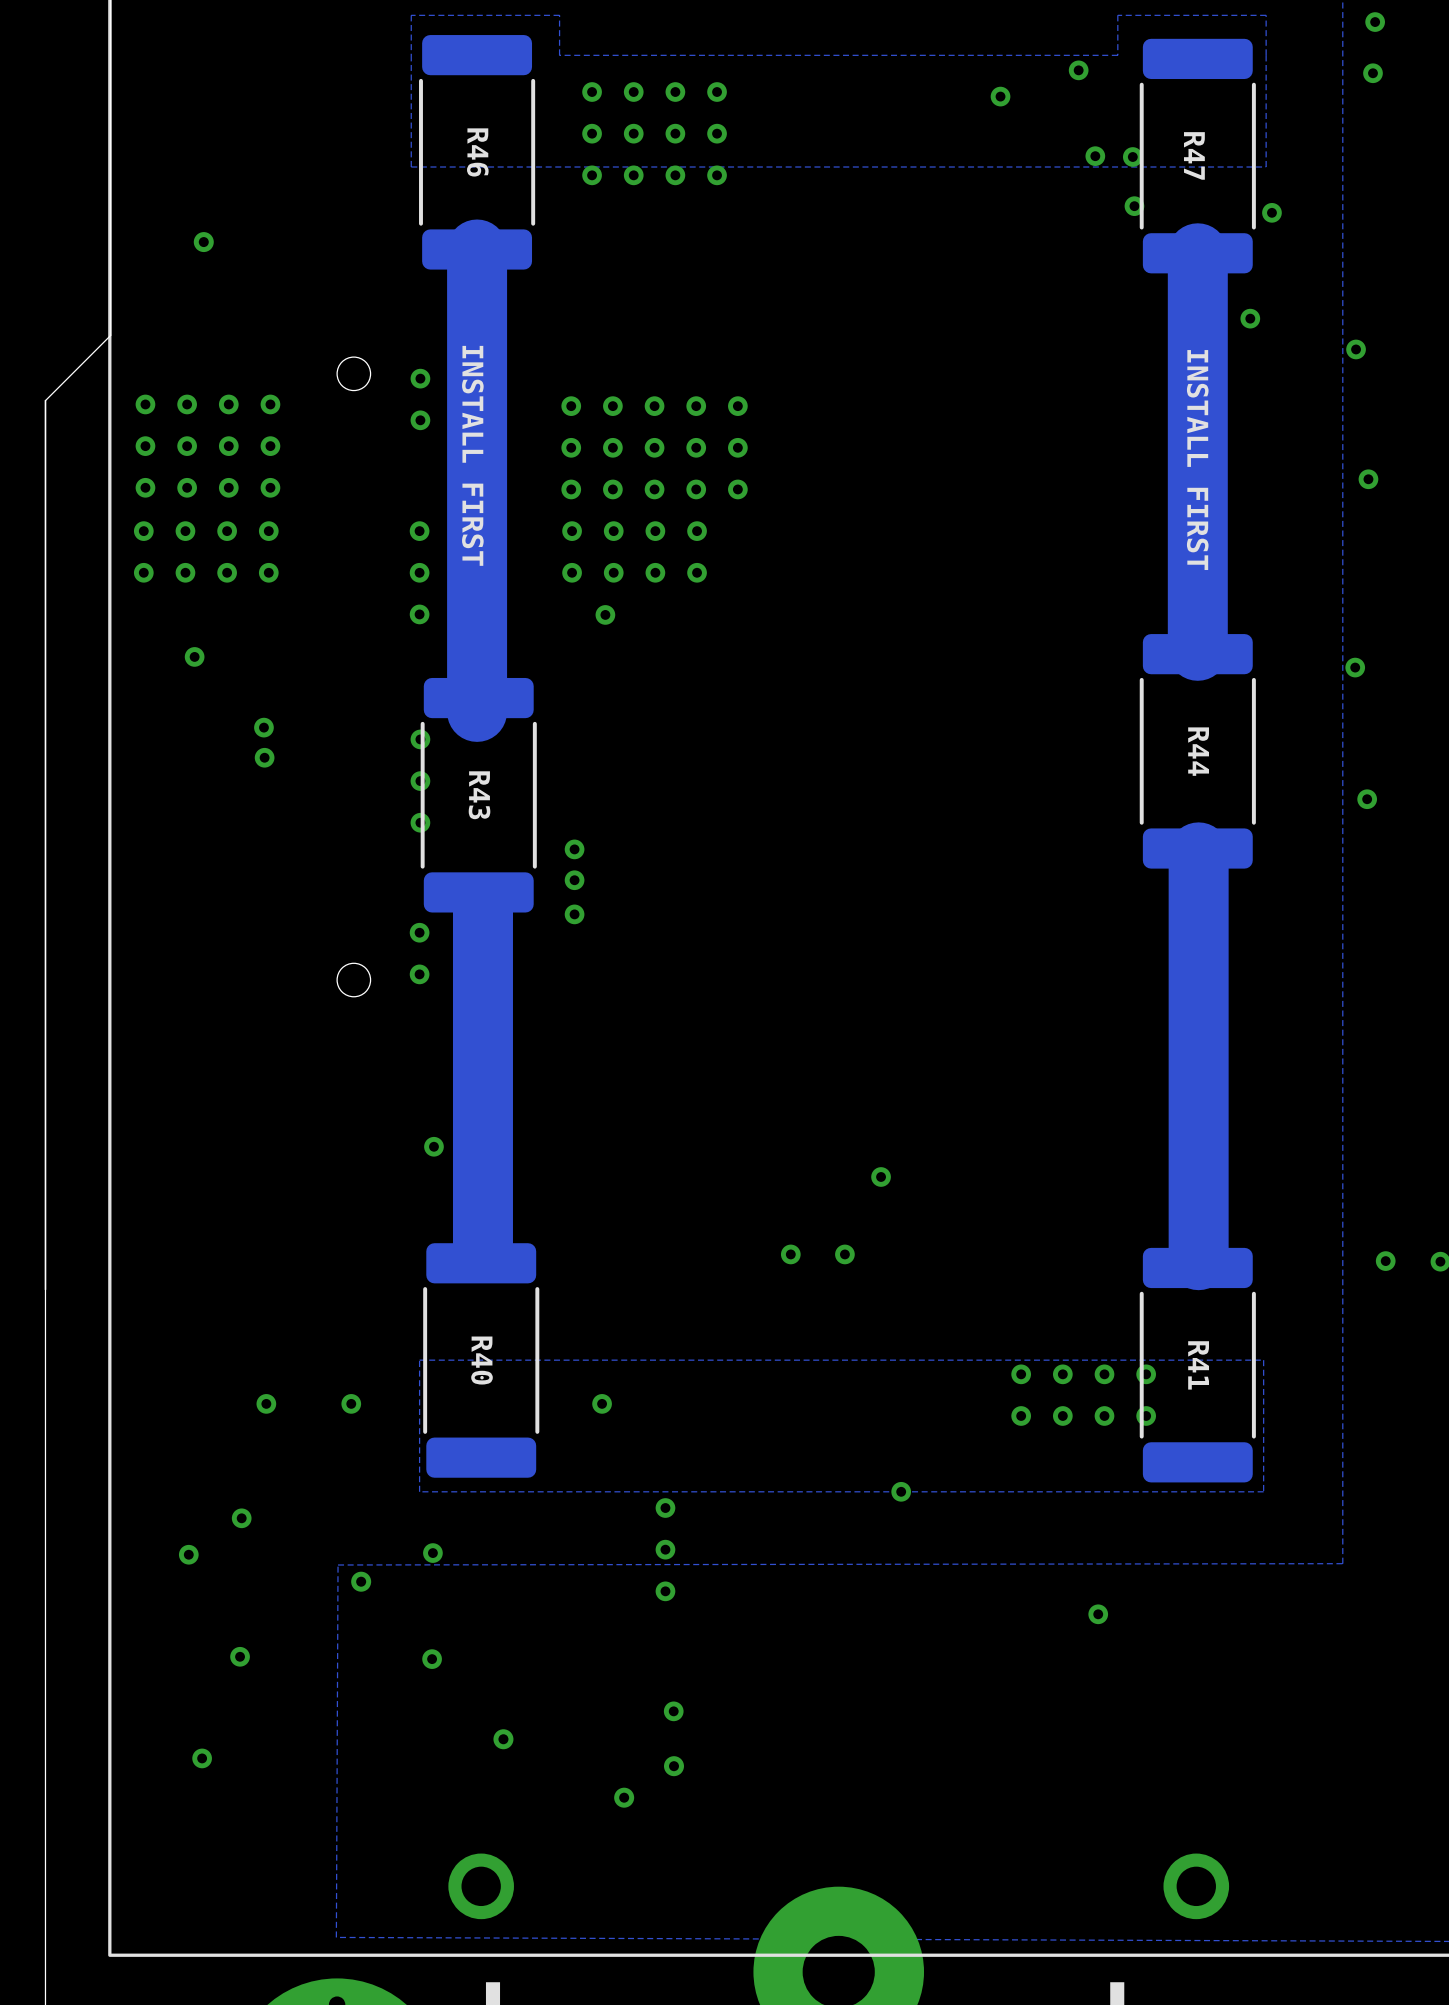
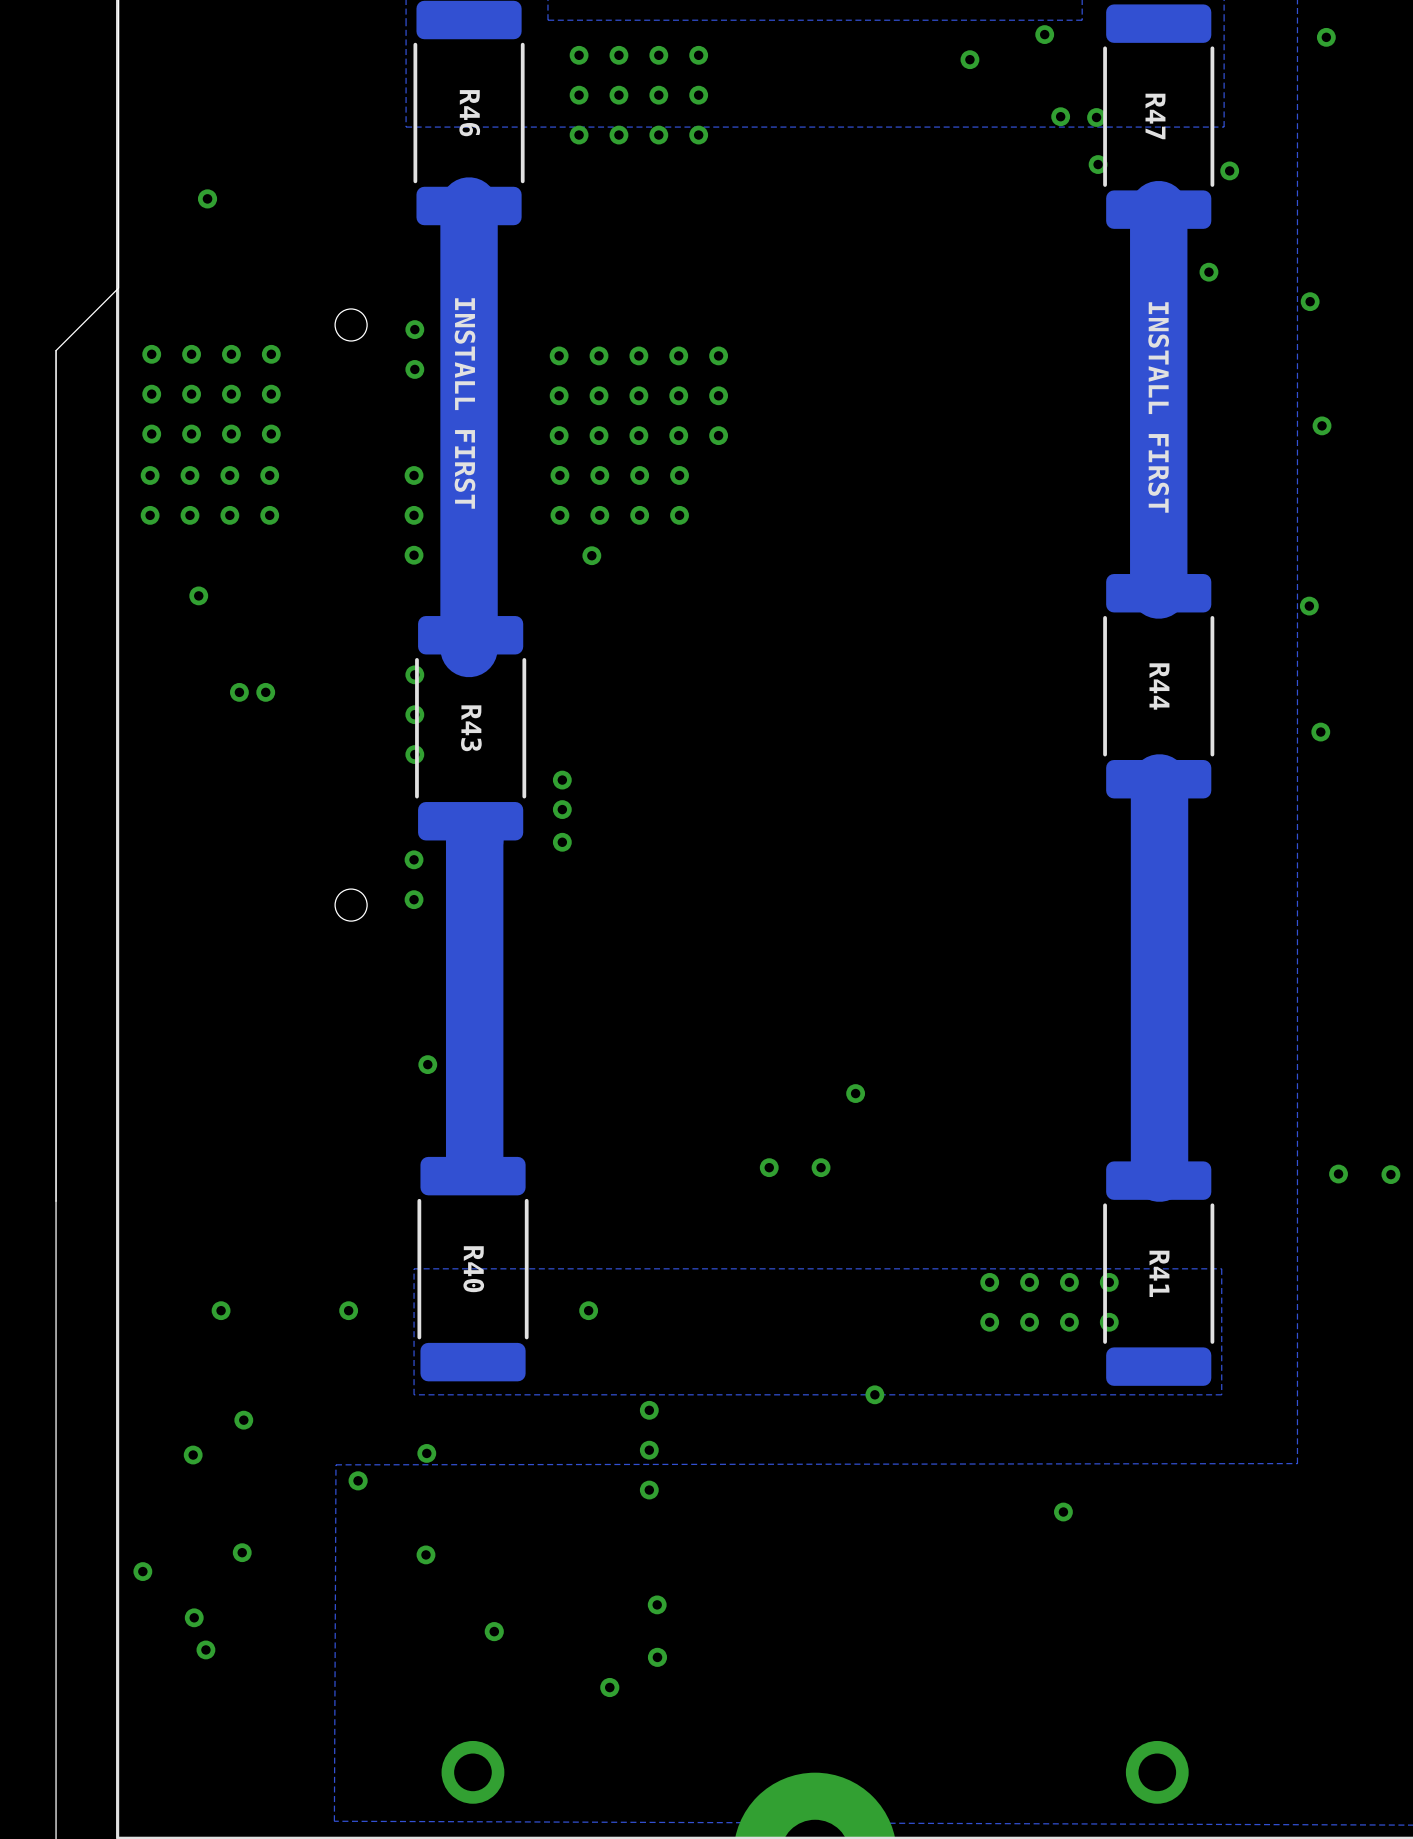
via position: (263, 727) -> (239, 692)
via position: (266, 1403) -> (221, 1310)
via: none -> (142, 1571)
via: none -> (194, 1617)

